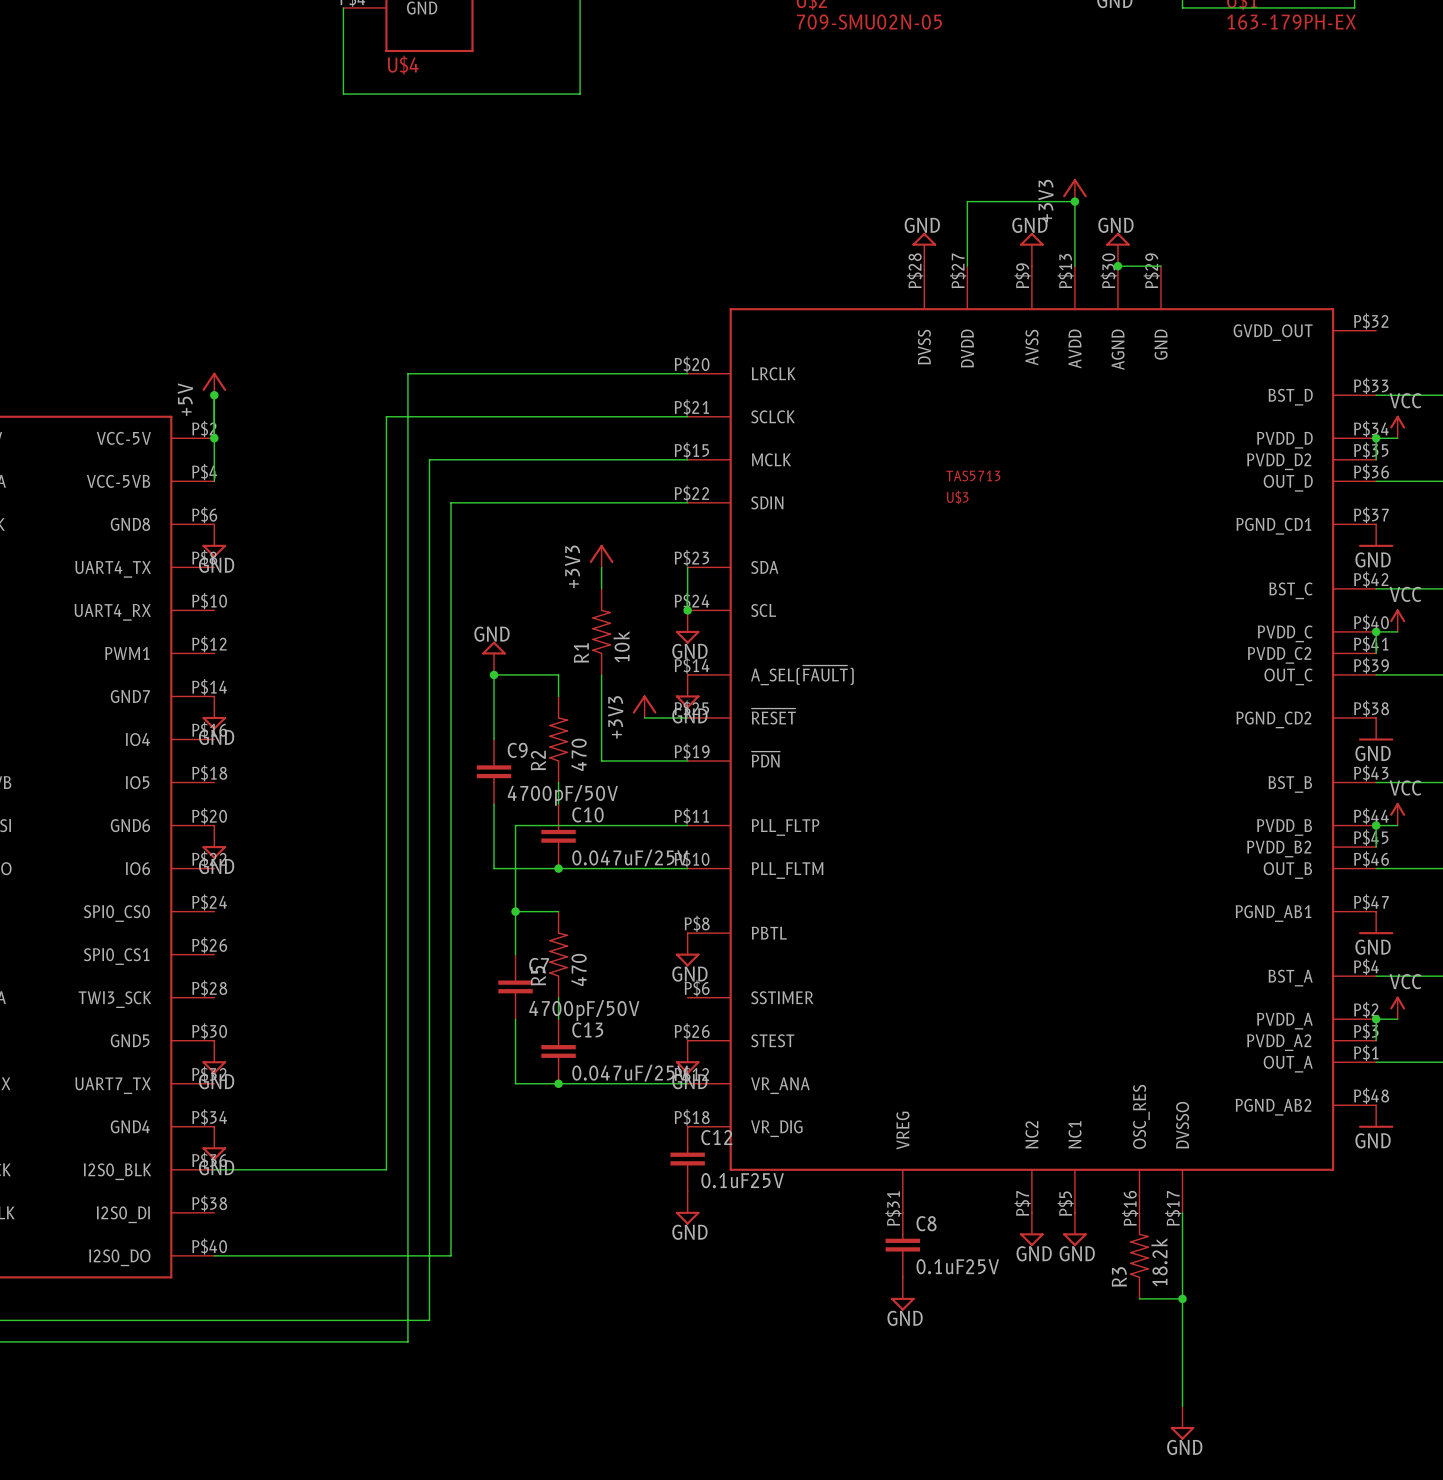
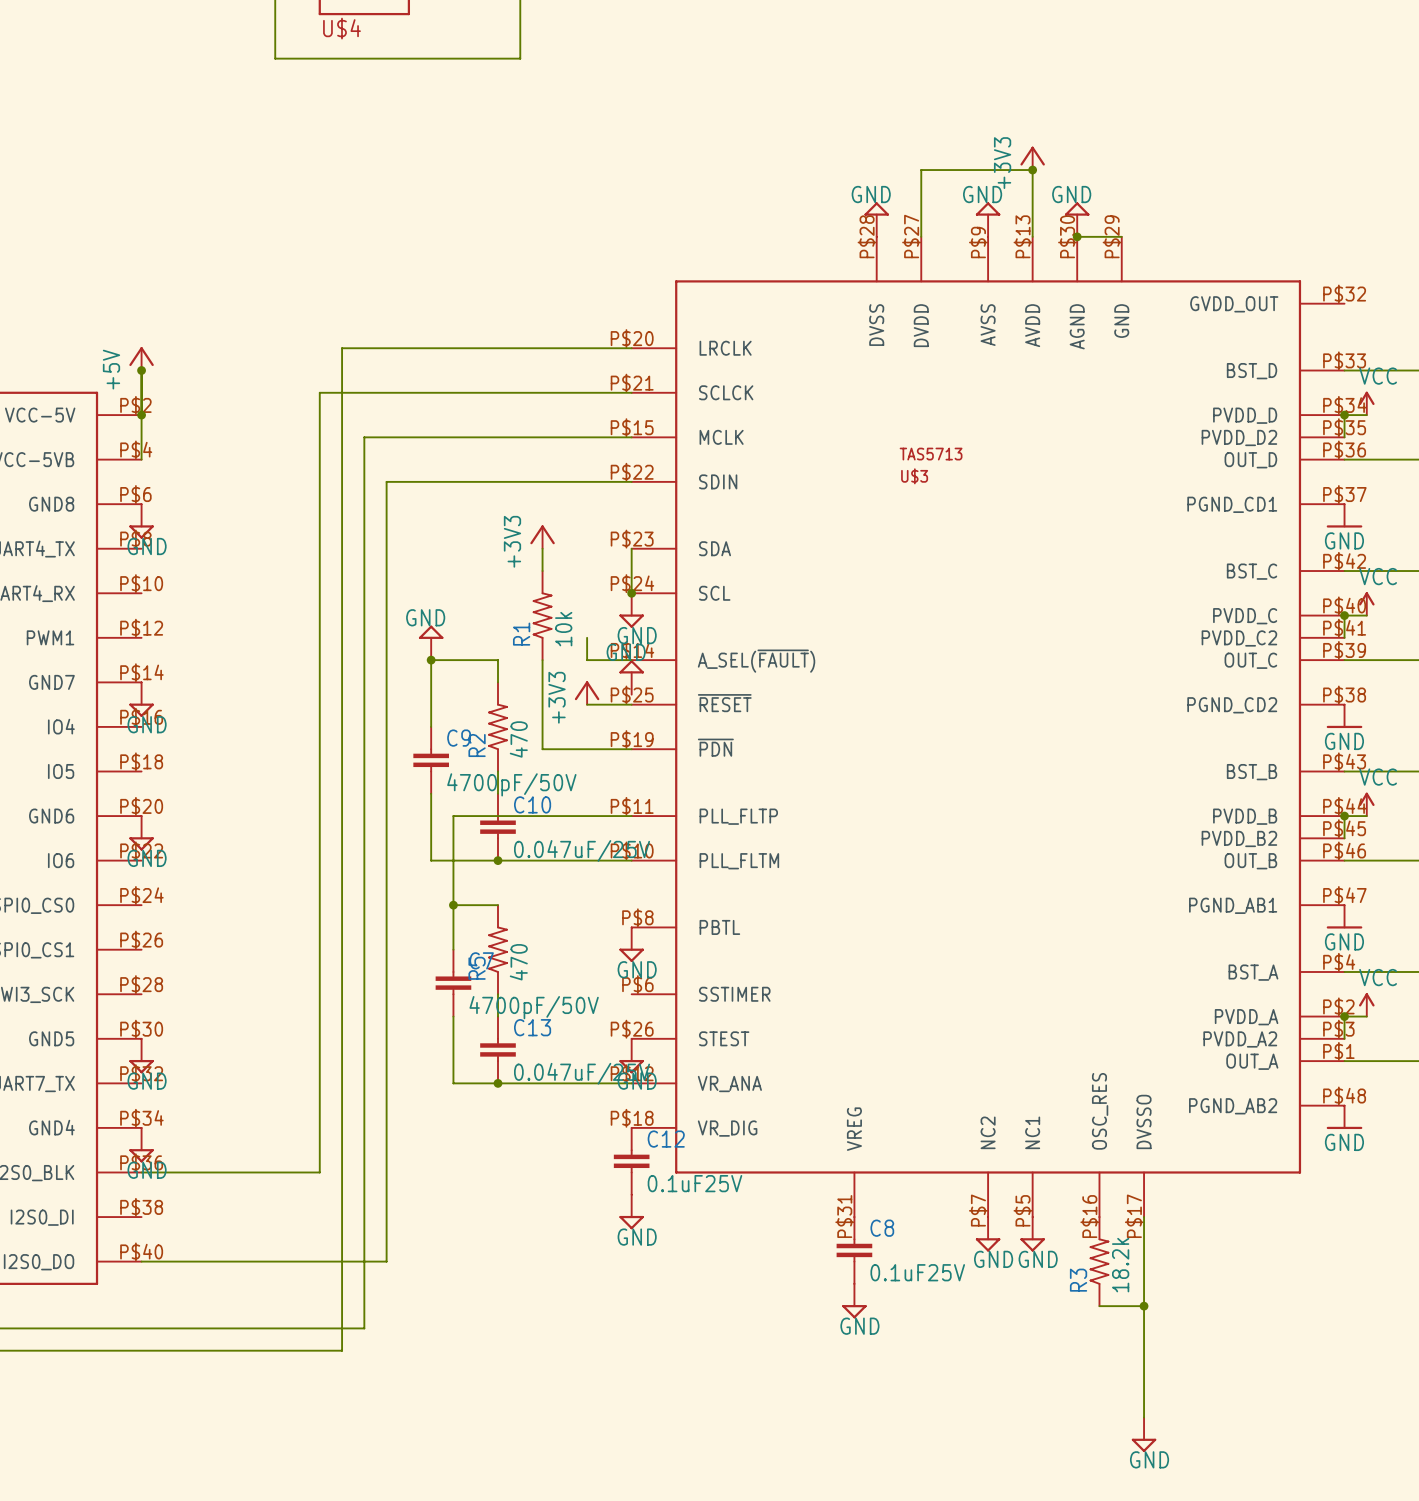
wire: none -> (587, 637) (587, 660) (631, 660)
power symbol rotation: 0° (687, 701) -> 180° (631, 666)

